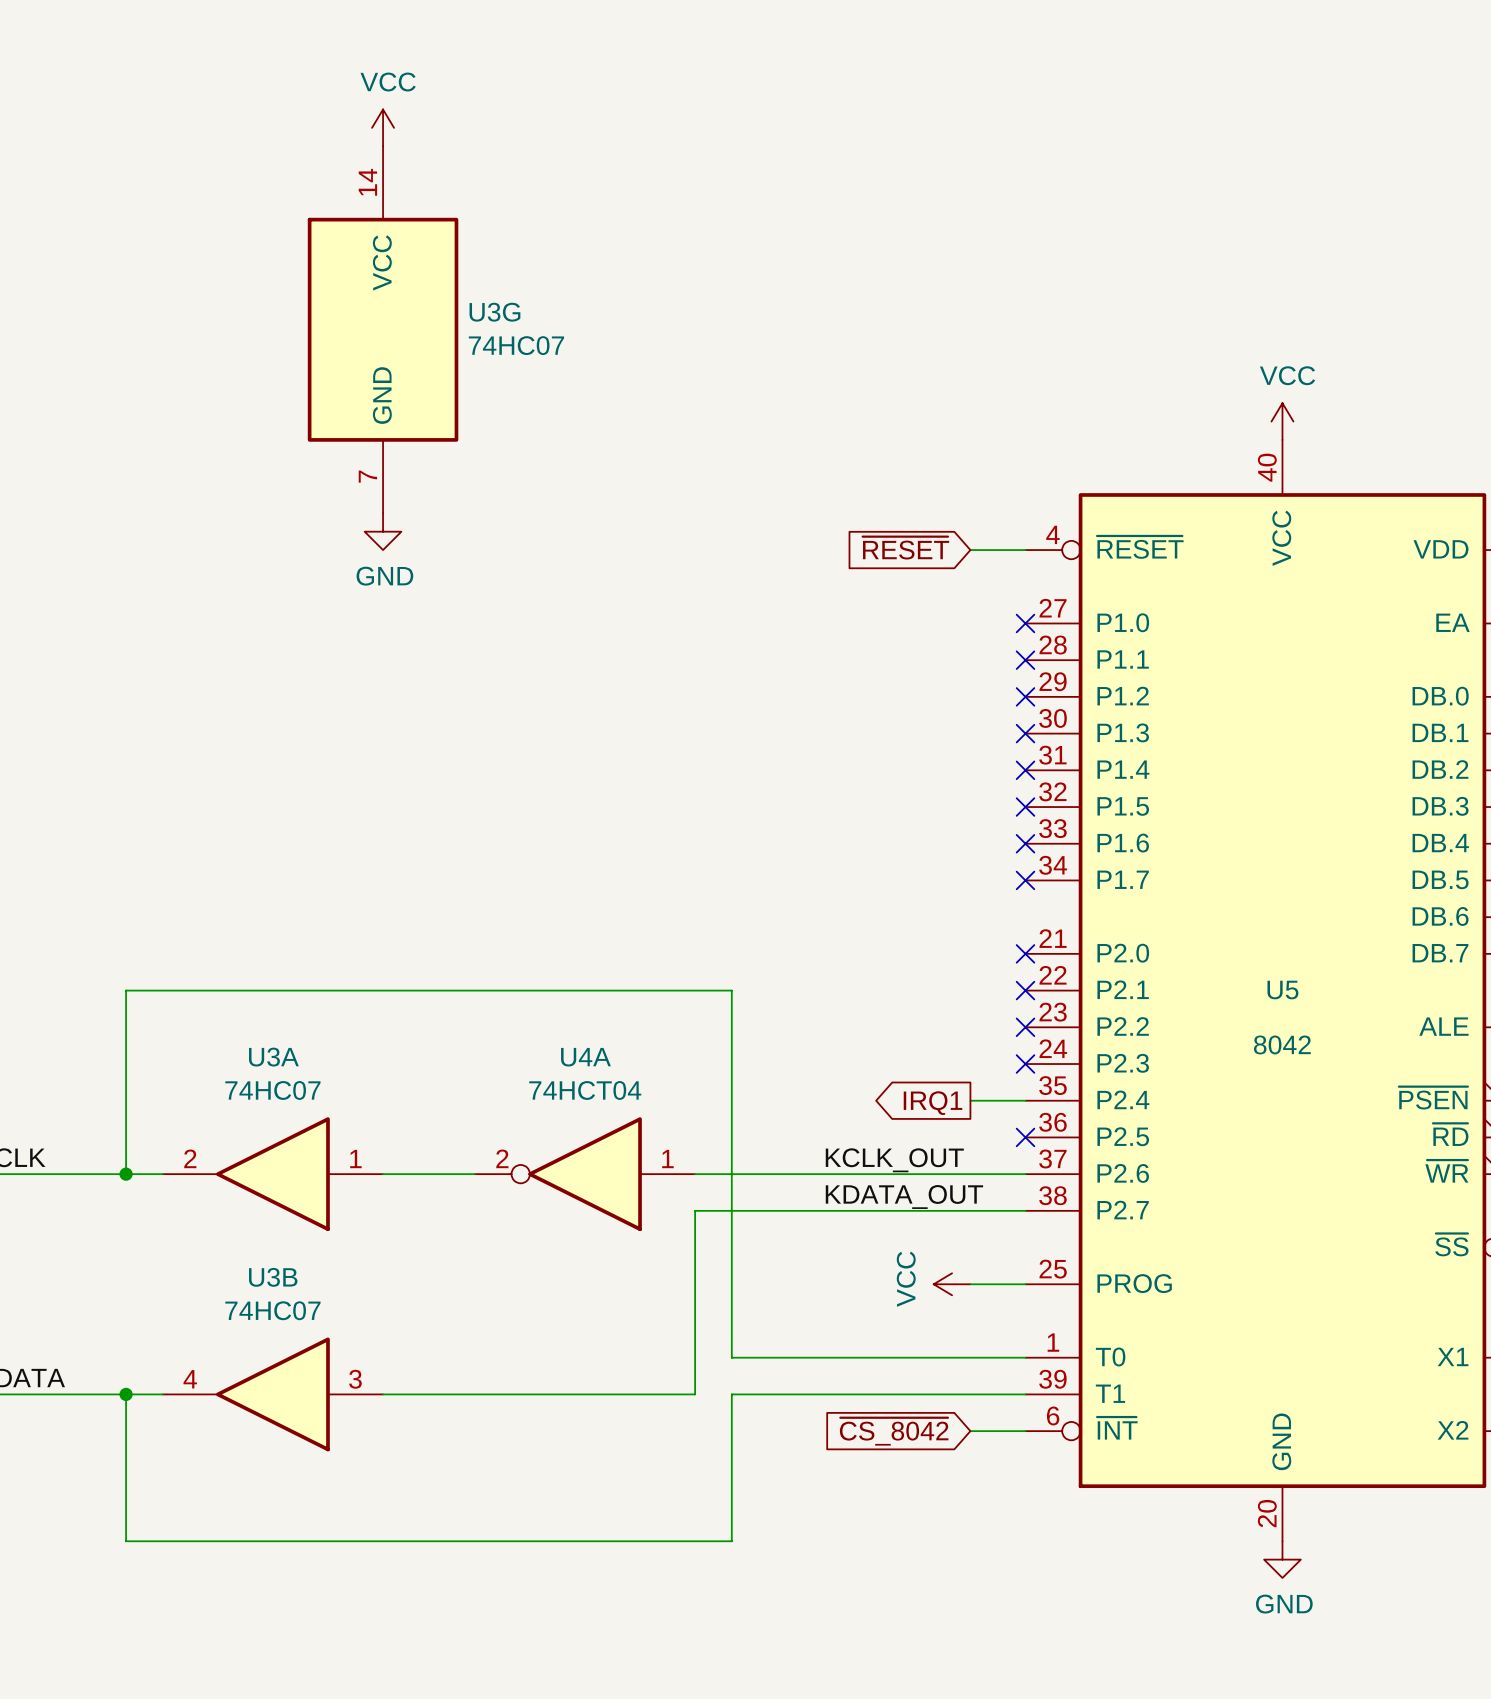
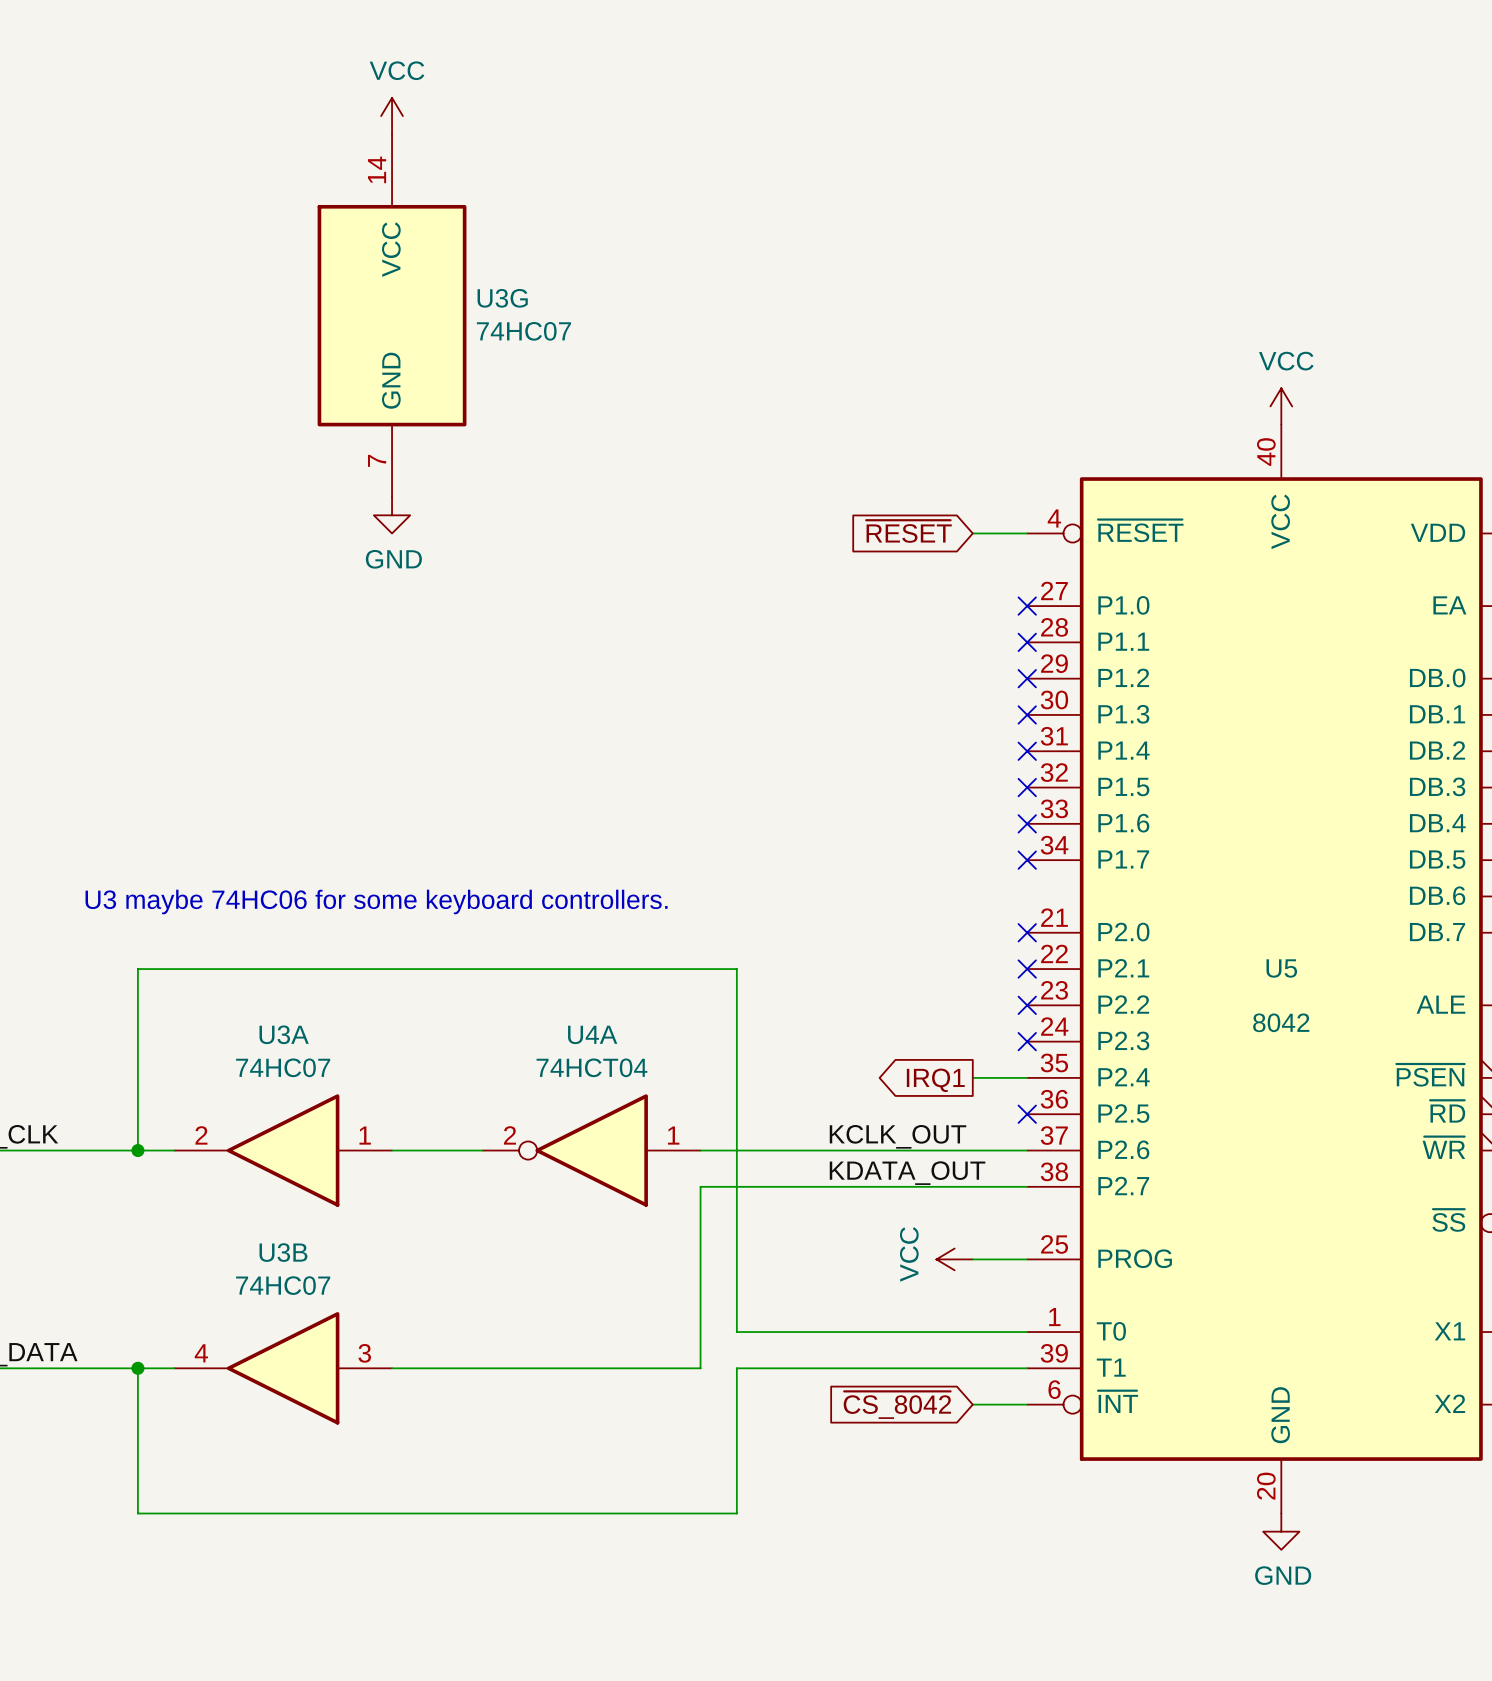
text: none -> U3 maybe 74HC06 for some keyboard controllers. (376, 901)

